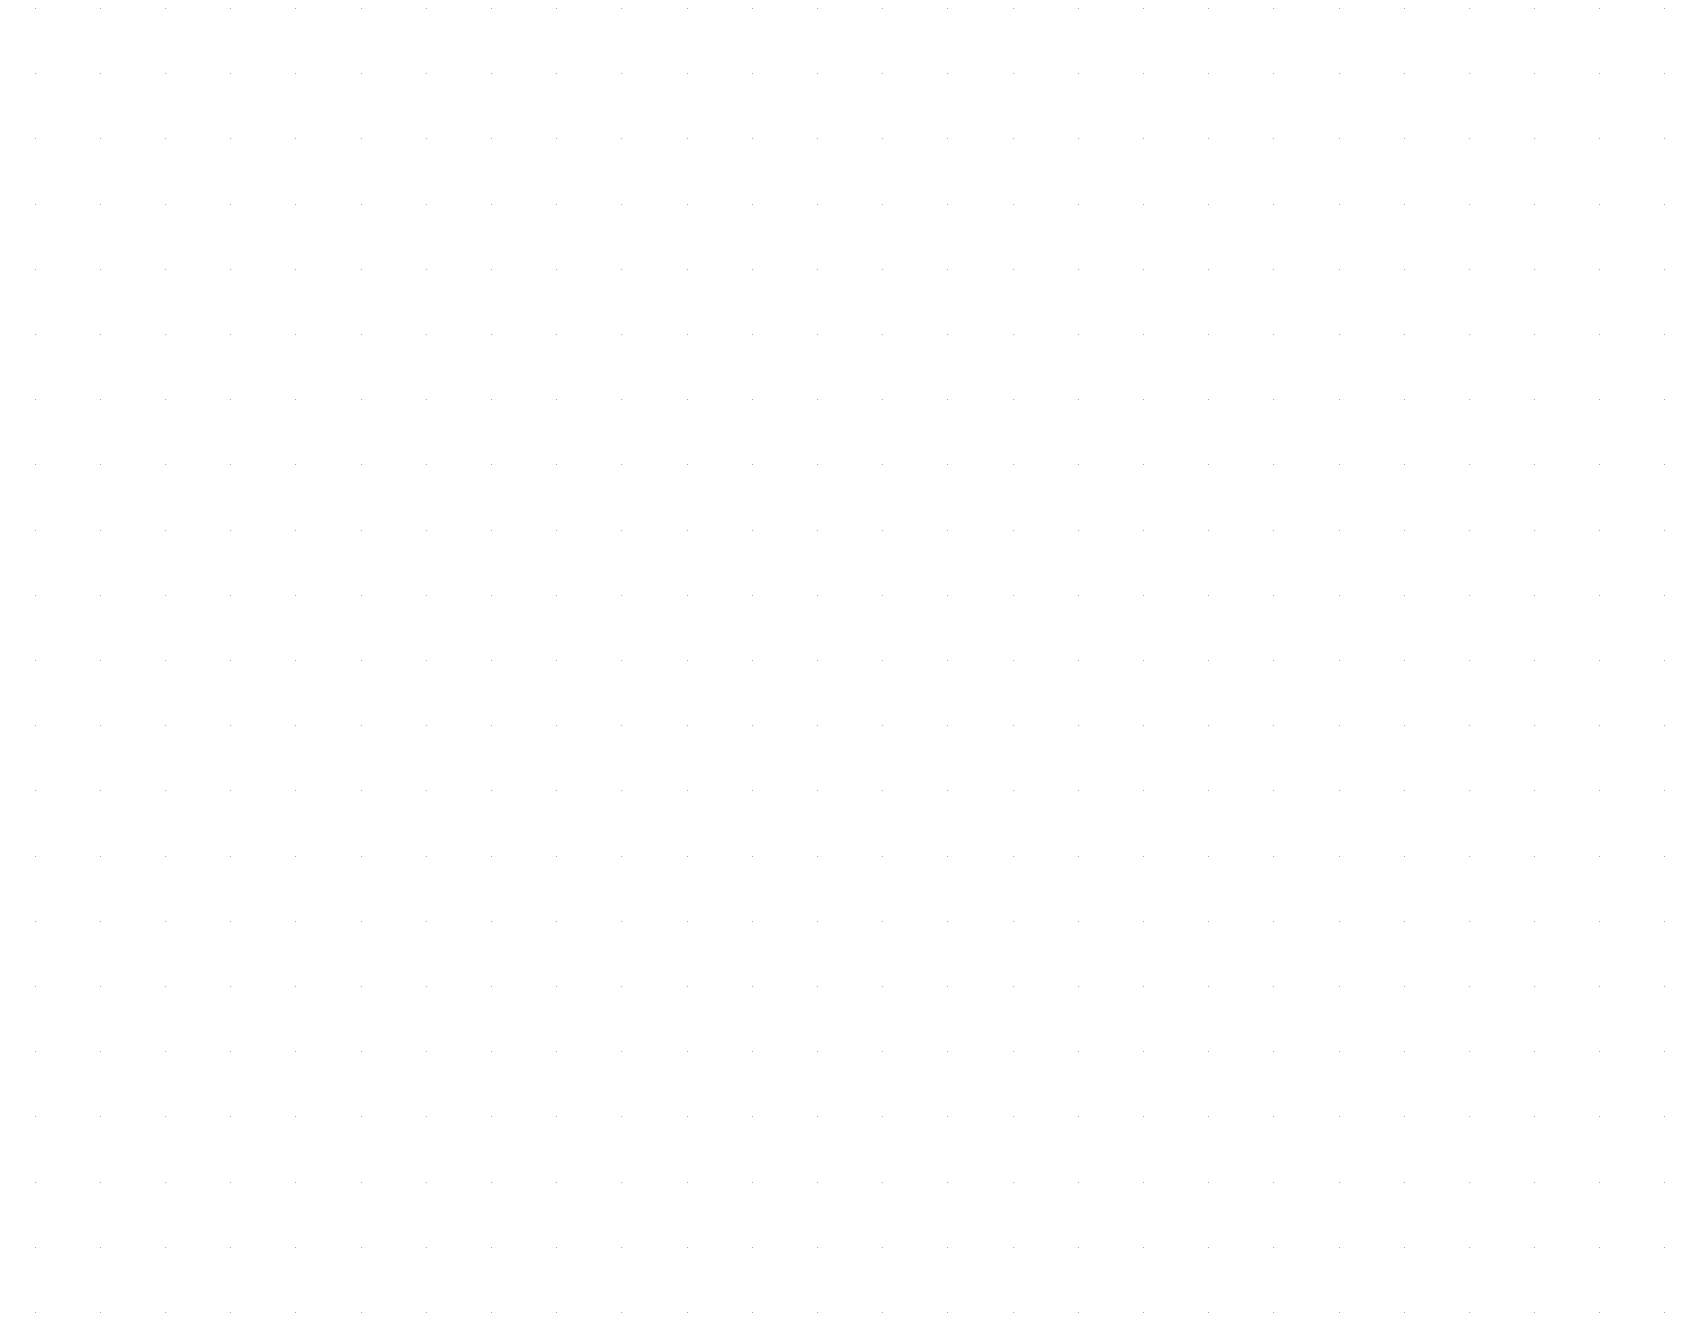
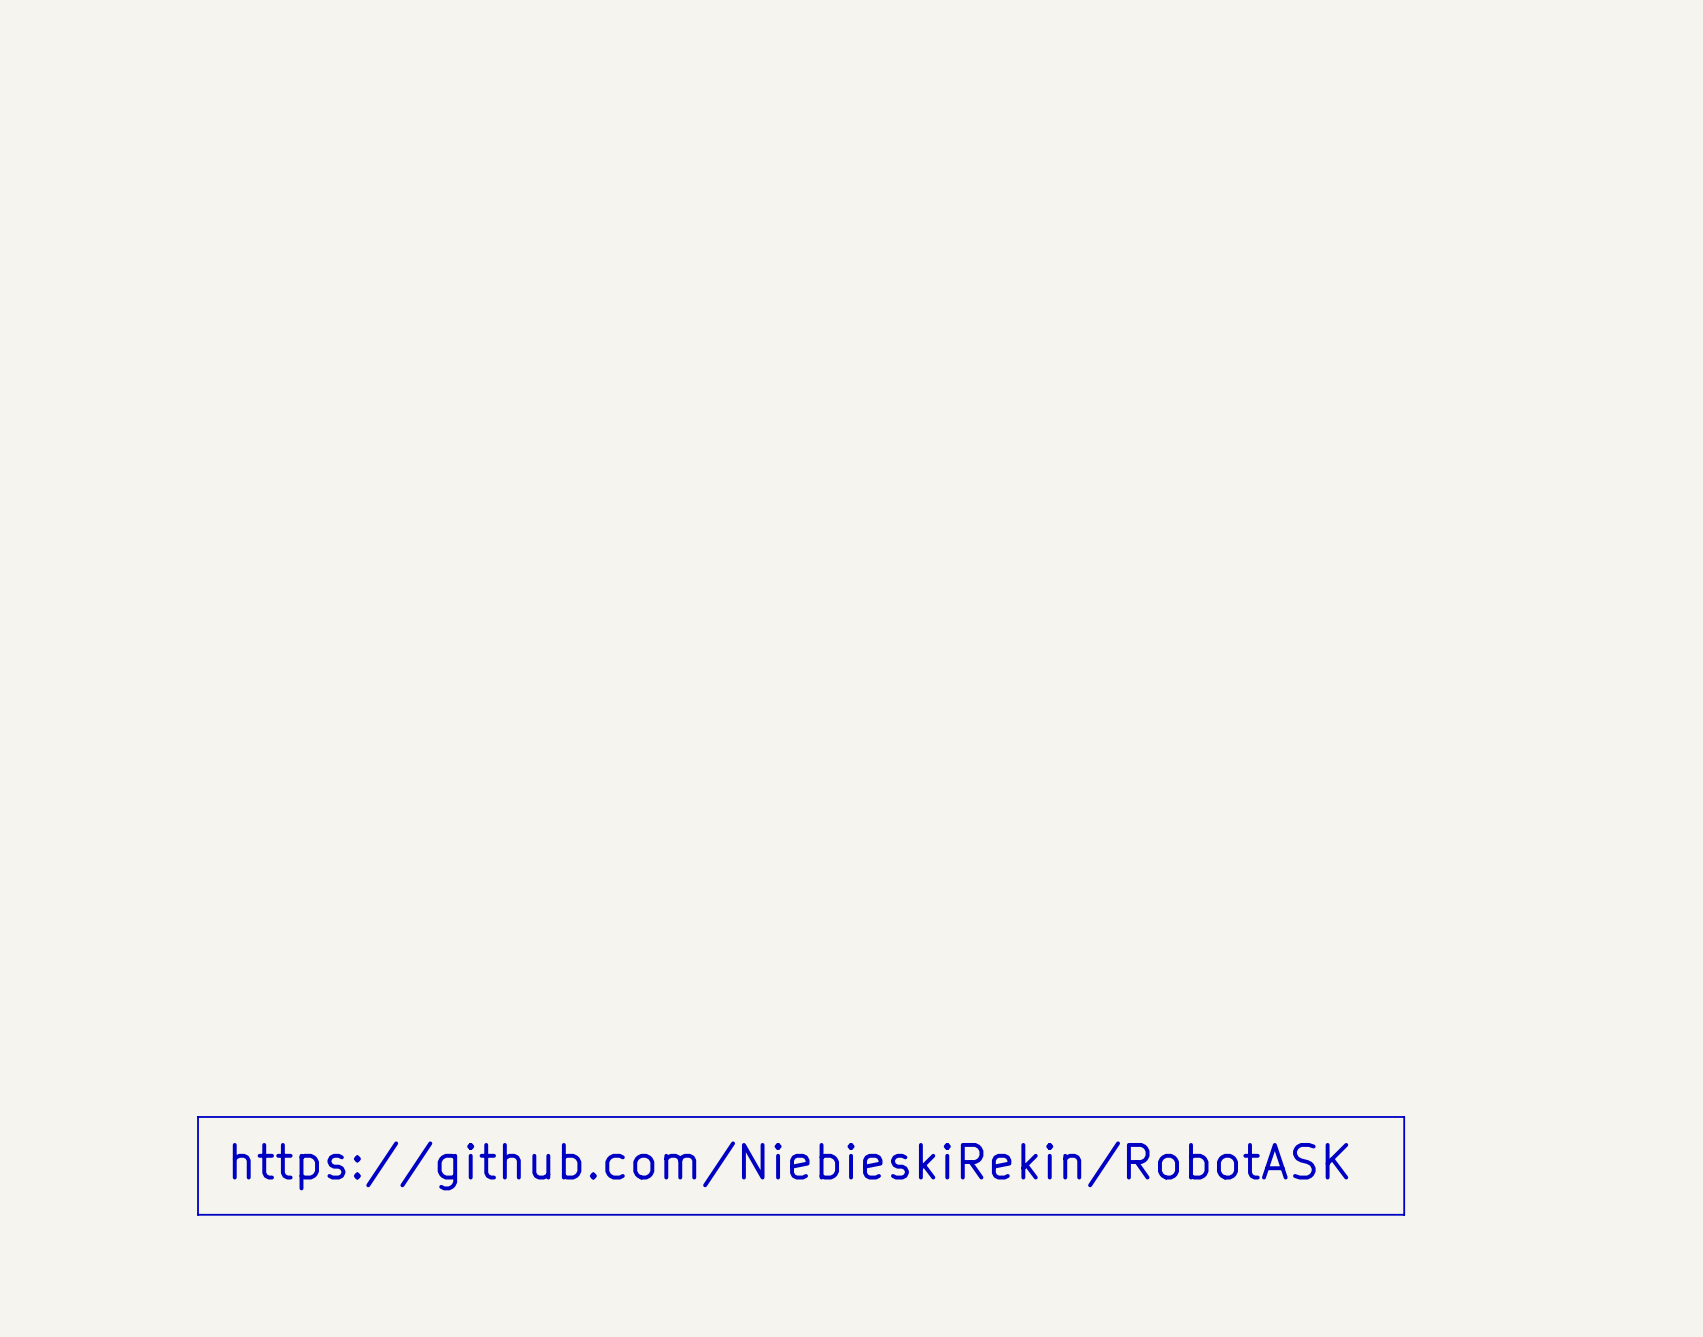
line: none -> (198, 1116) (1404, 1116) (1404, 1214) (198, 1214) (198, 1116)
text: none -> https://github.com/NiebieskiRekin/RobotASK (790, 1165)

